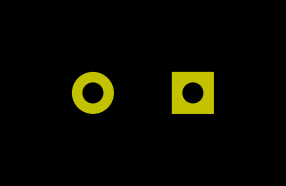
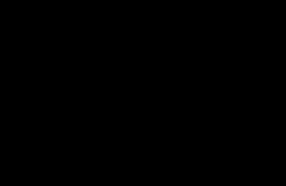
part: (142, 92) -> none

